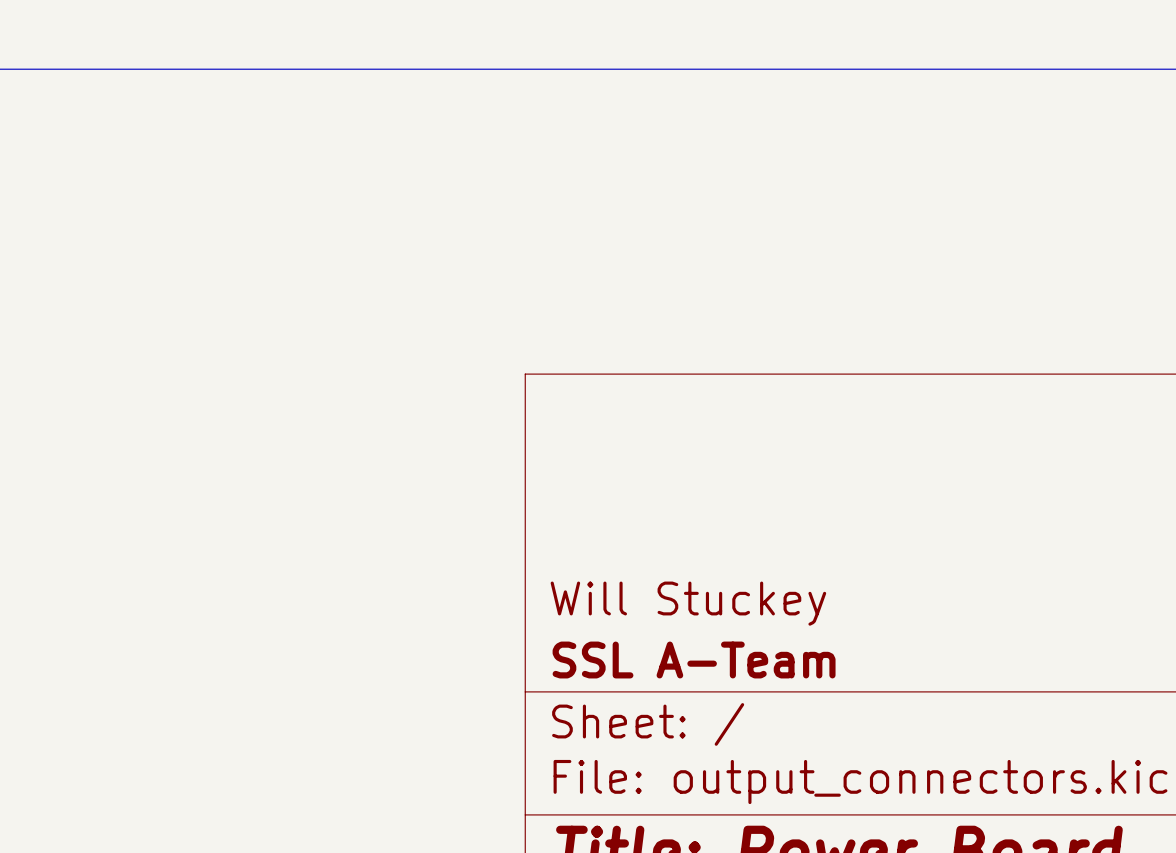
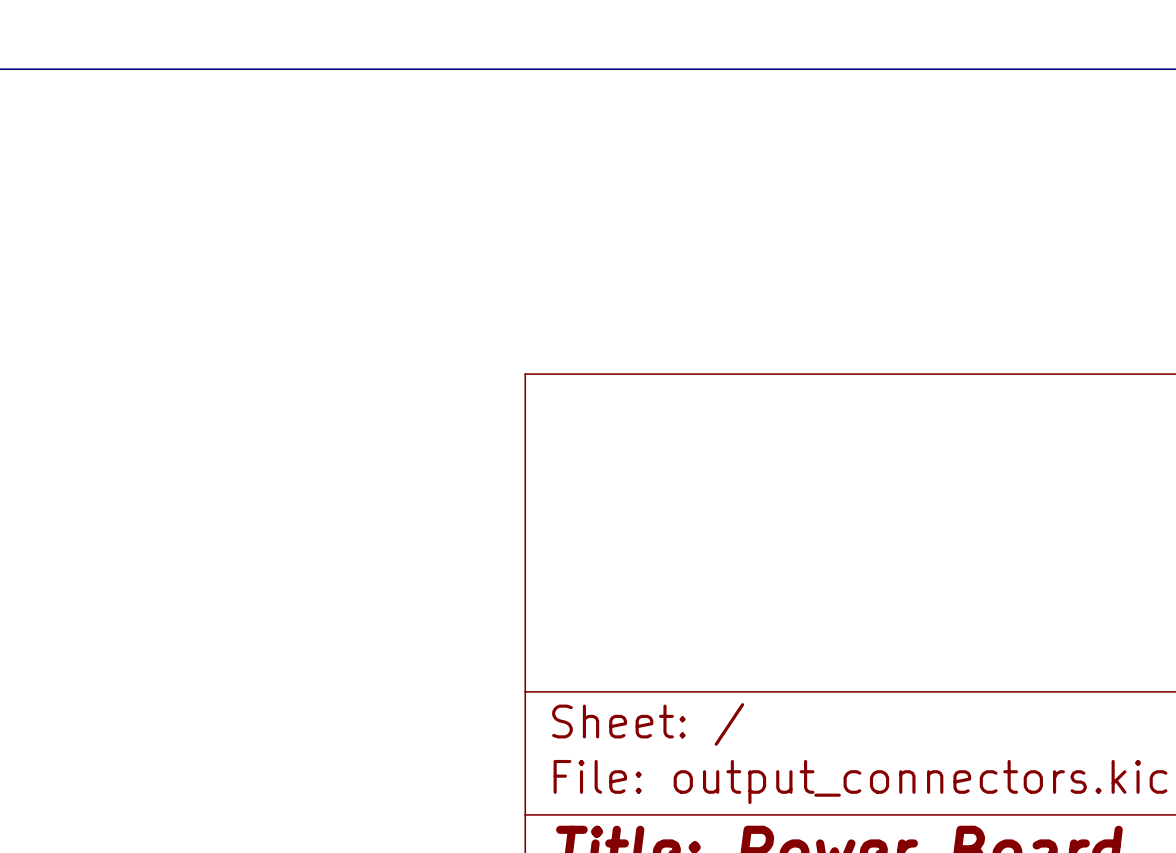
title block: Will Stuckey (688, 603) -> none
title block: SSL A-Team (694, 660) -> none

